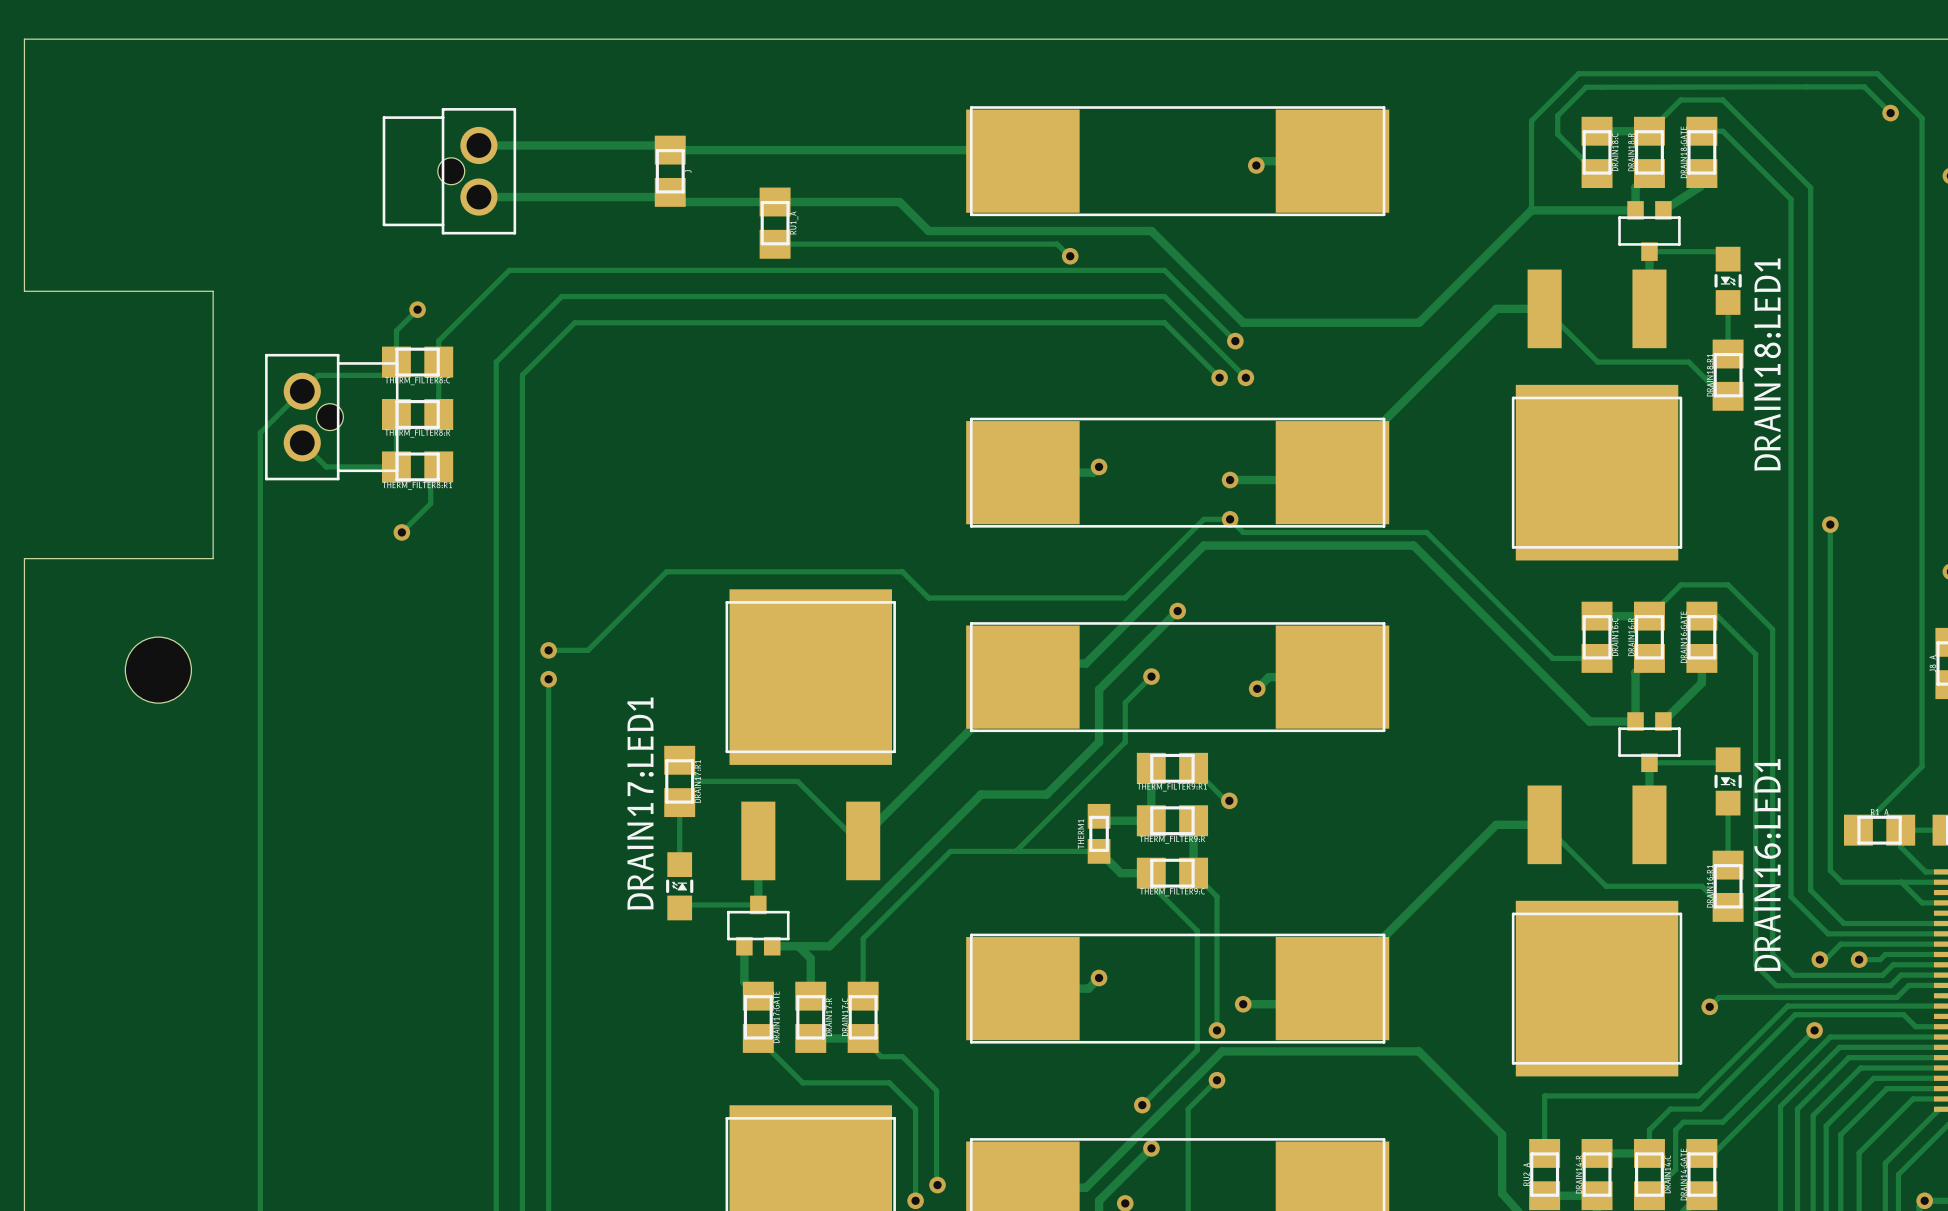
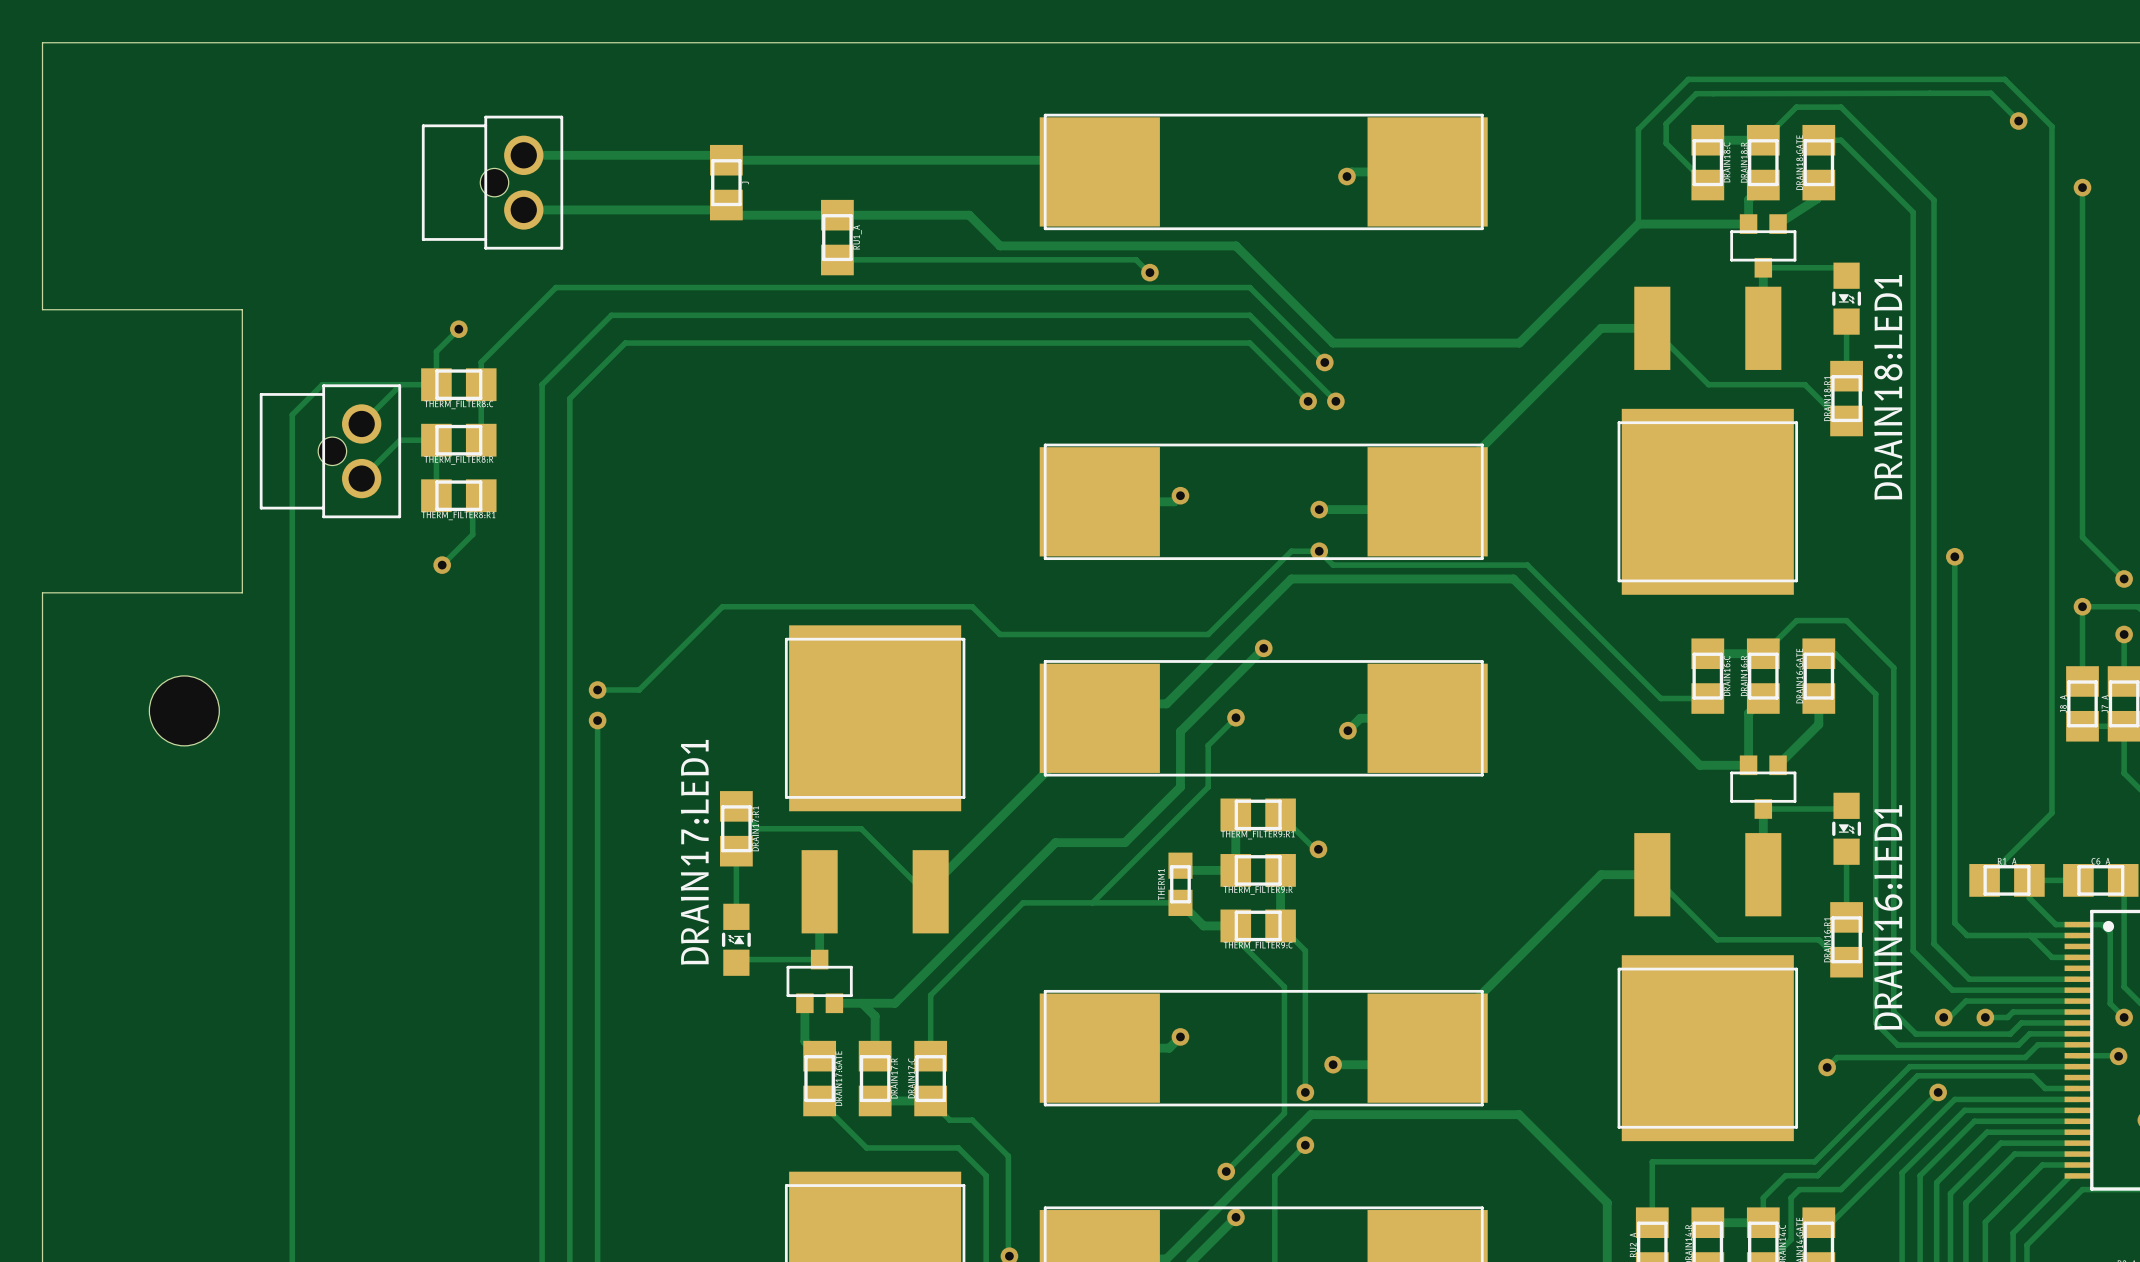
track: none -> (400, 384) (361, 423)
track: (396, 362) (383, 375) (318, 375) (302, 391) -> (436, 384) (322, 384) (292, 414) (292, 459)
track: (301, 391) (260, 432) -> none
track: none -> (436, 440) (400, 440) (361, 478)
part rotation: 0° (331, 417) -> 180° (330, 451)
track: (302, 442) (326, 466) (396, 466) -> none

